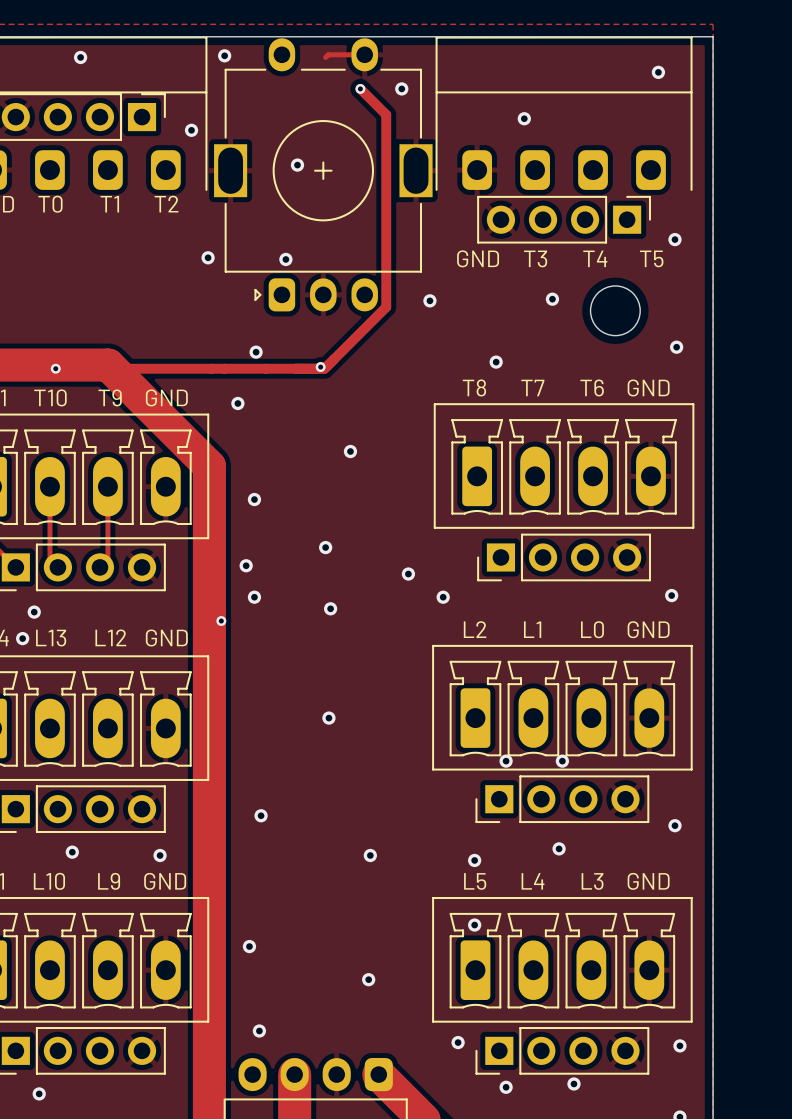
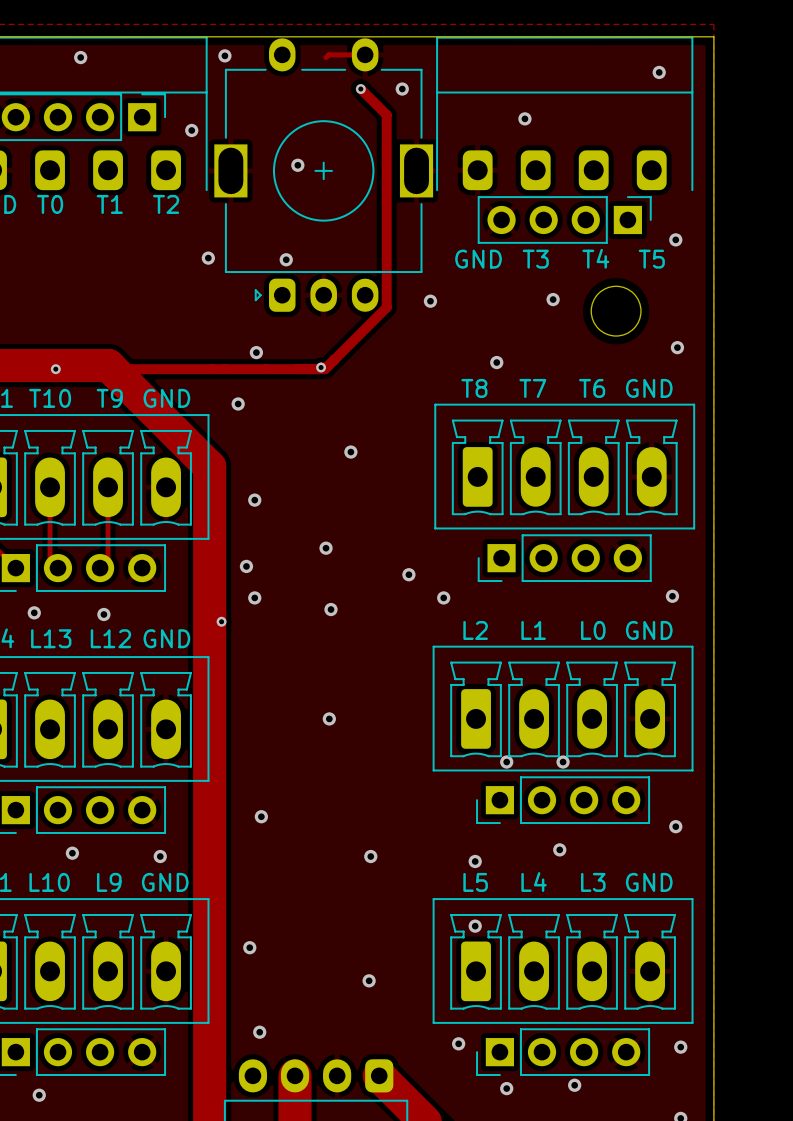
via position: (22, 638) -> (103, 614)

